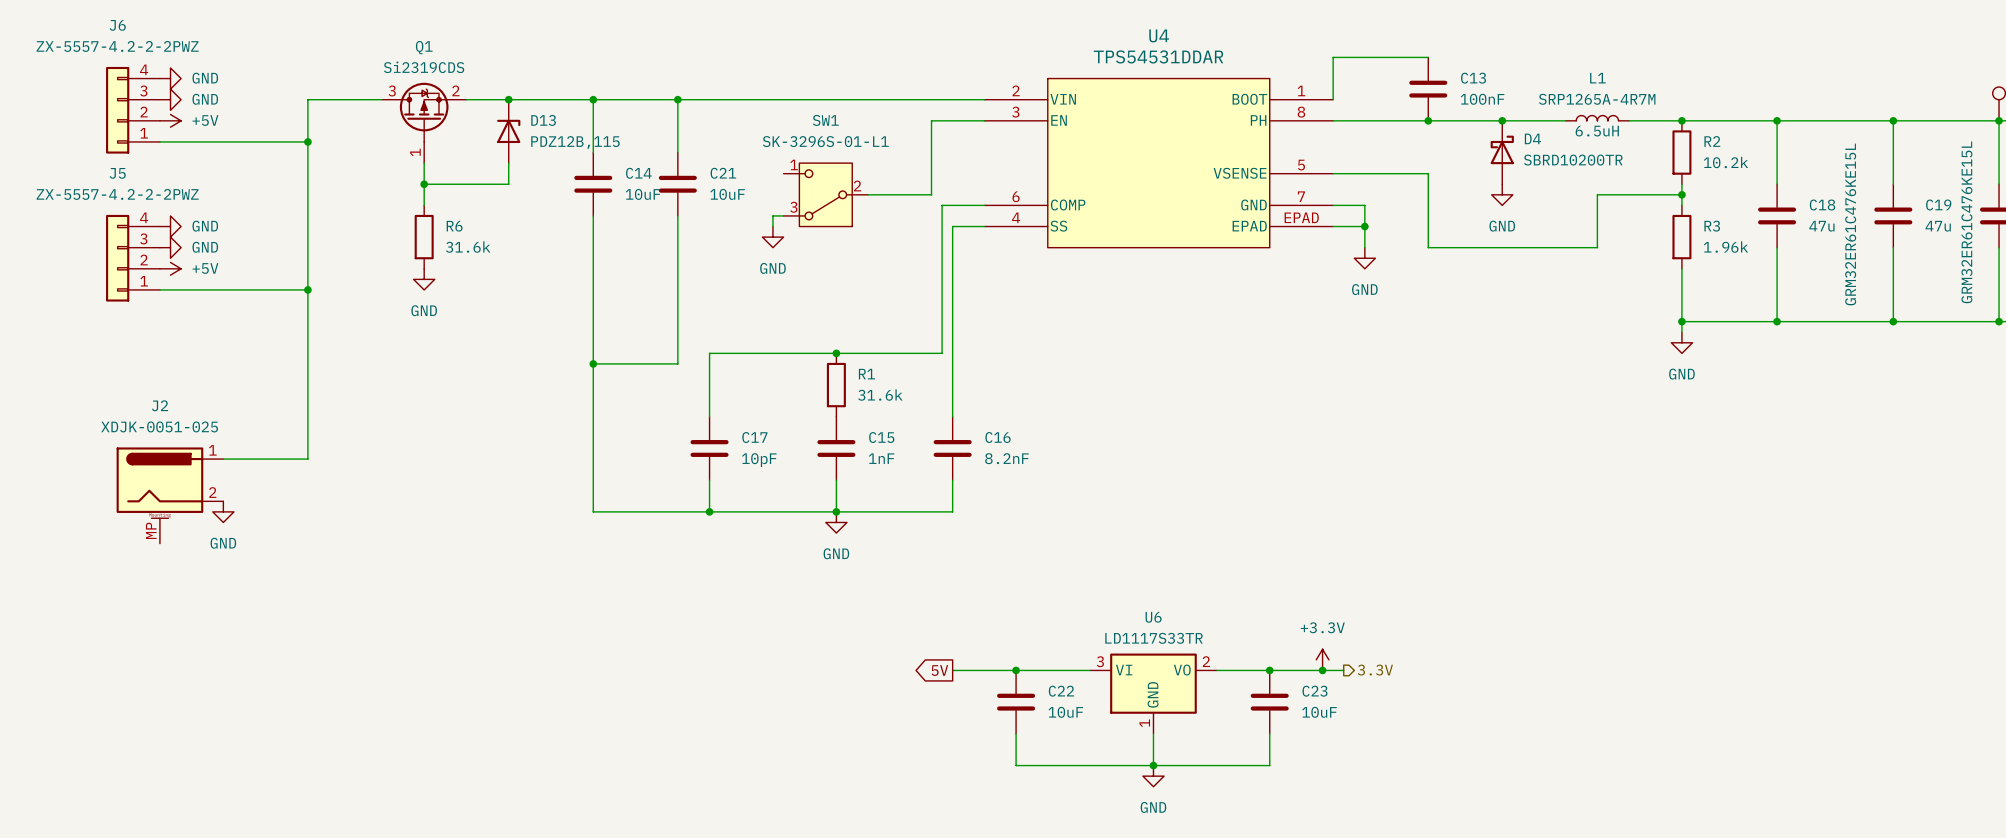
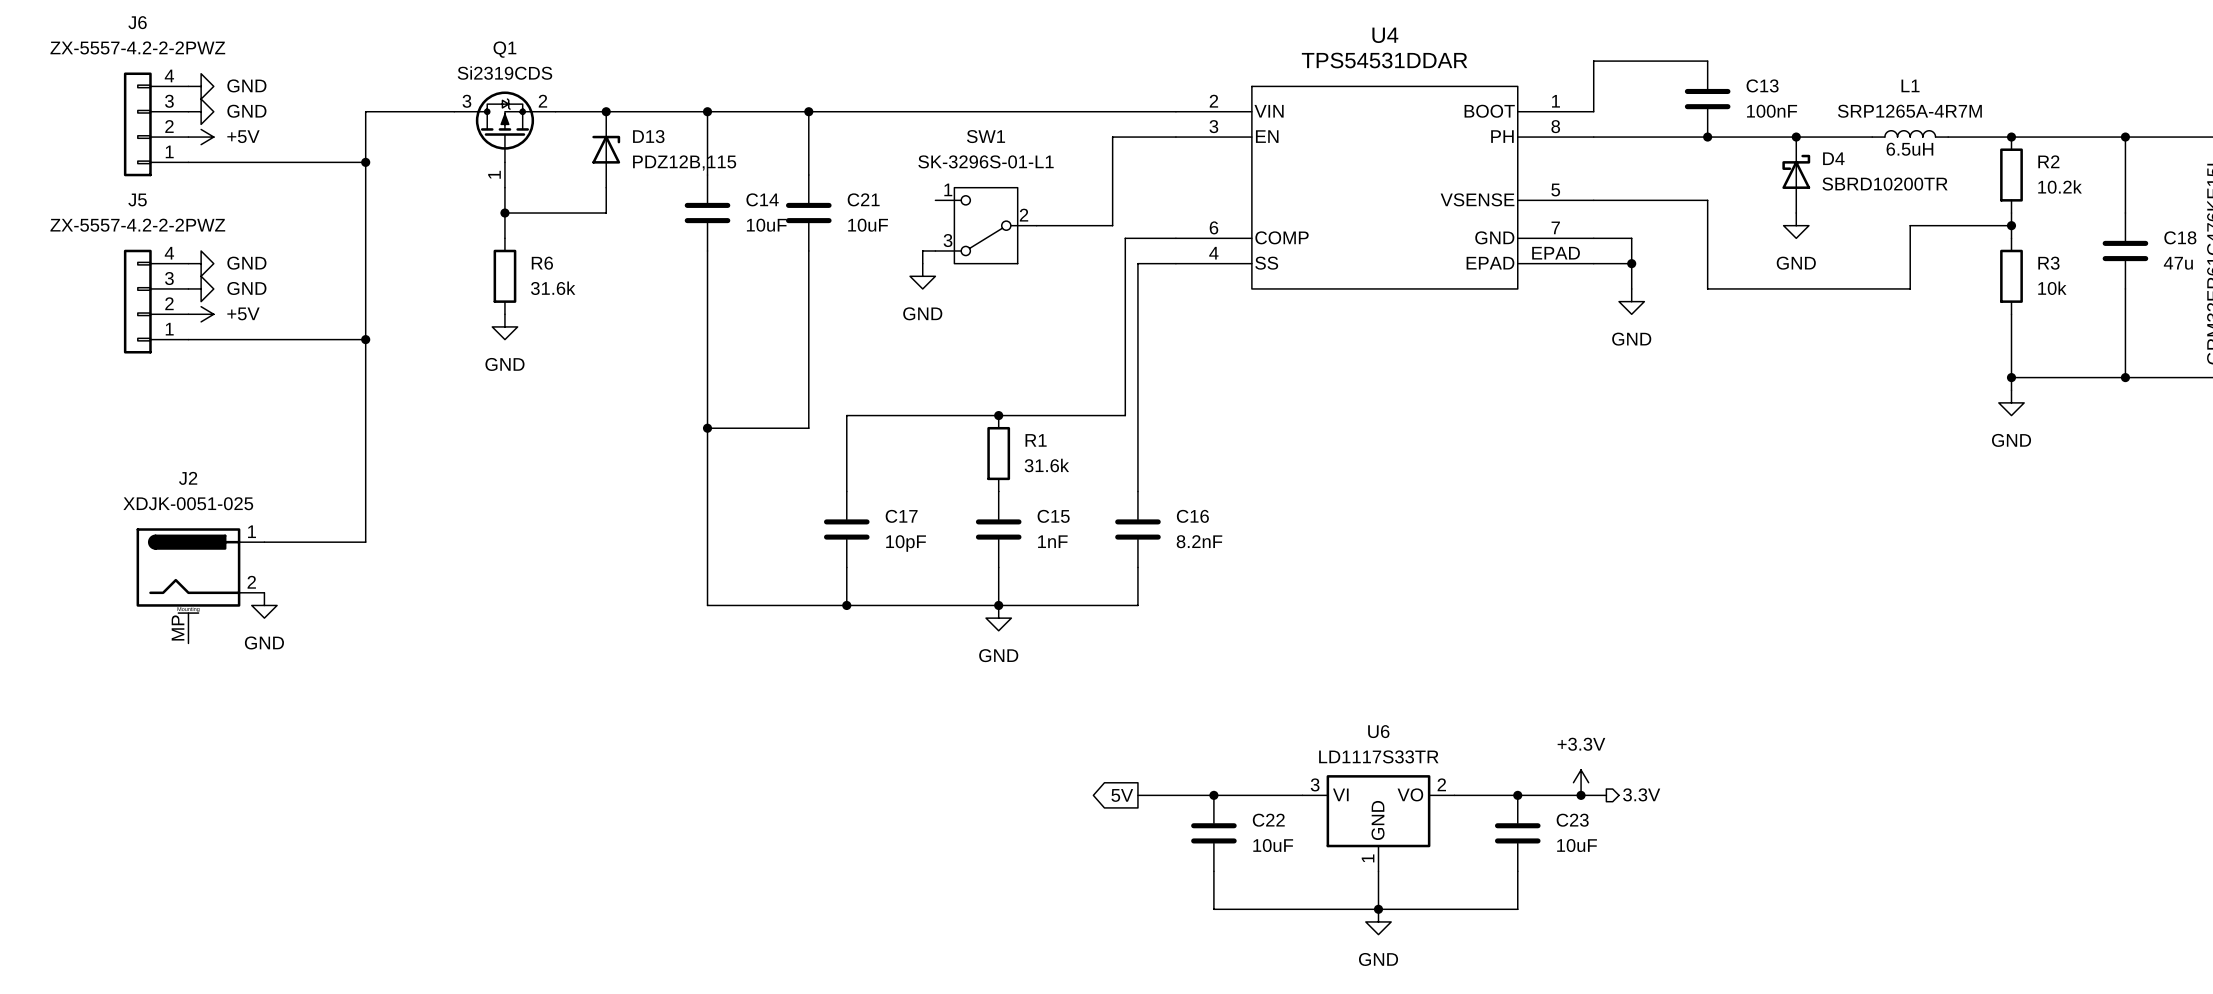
R3 value: 1.96k (1726, 247) -> 10k (2052, 288)

